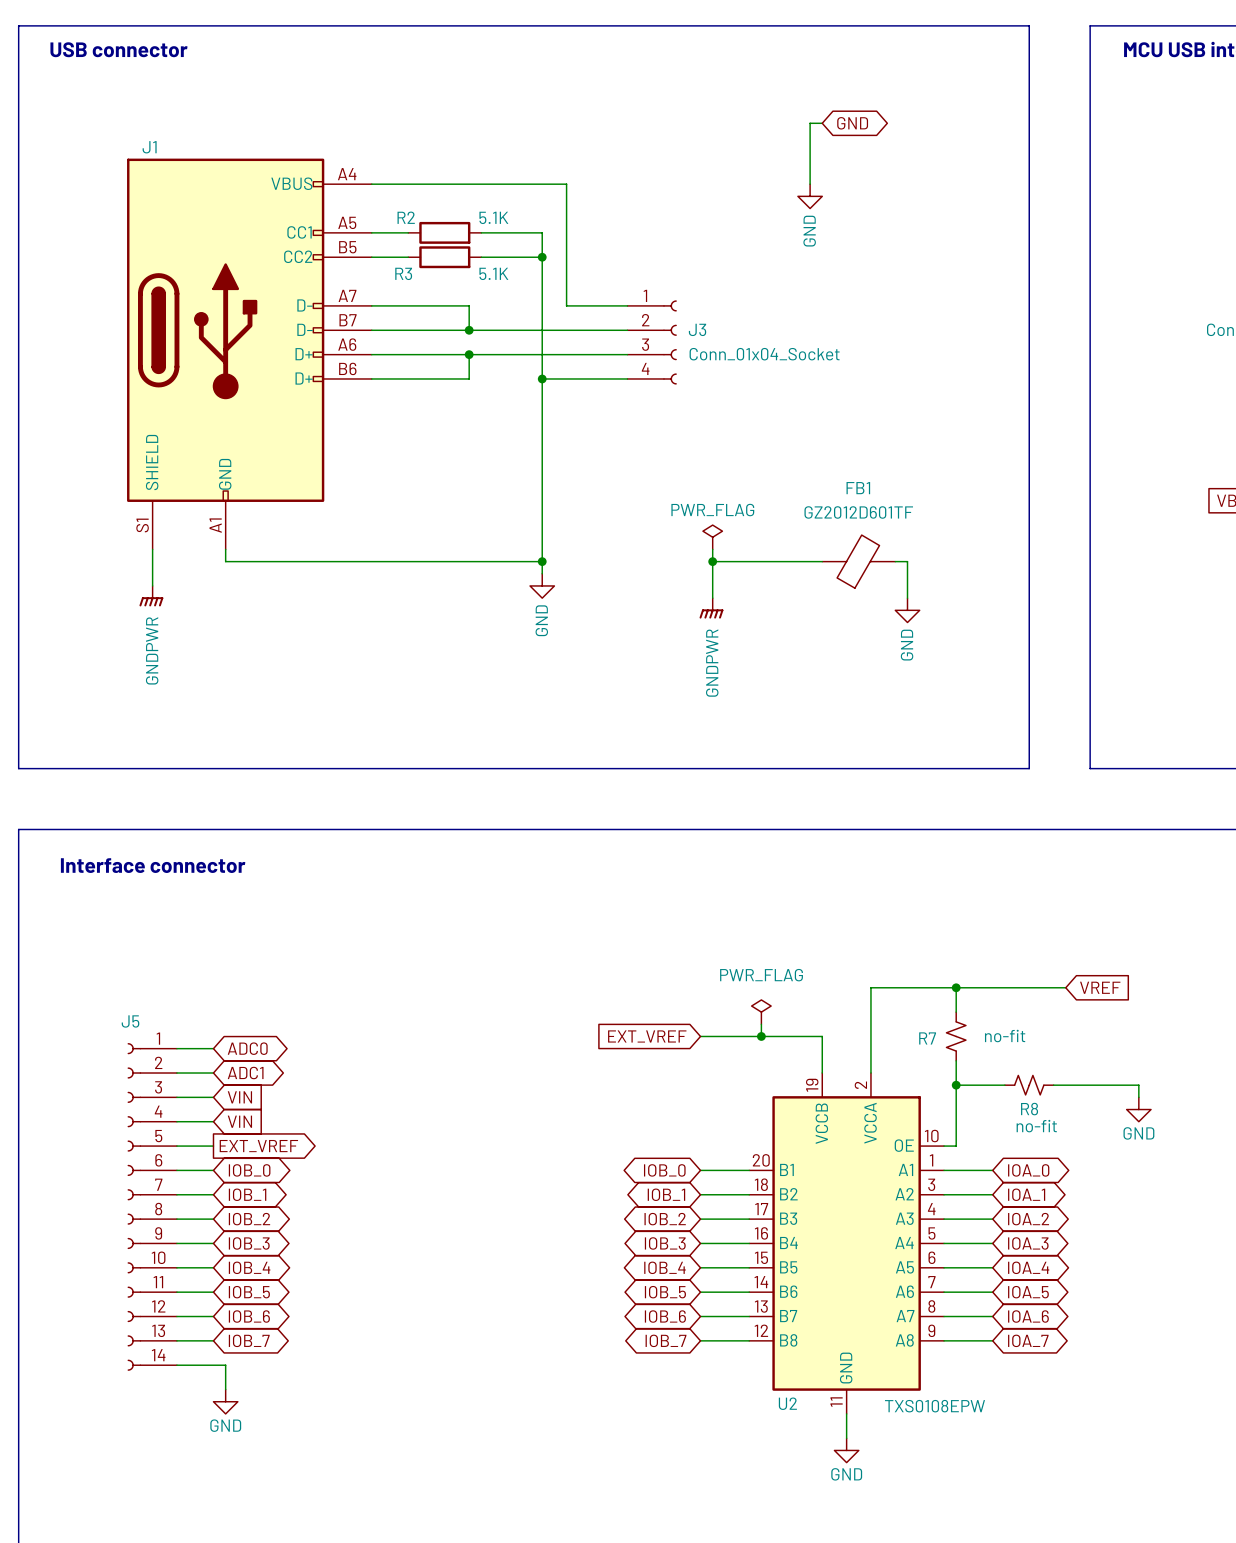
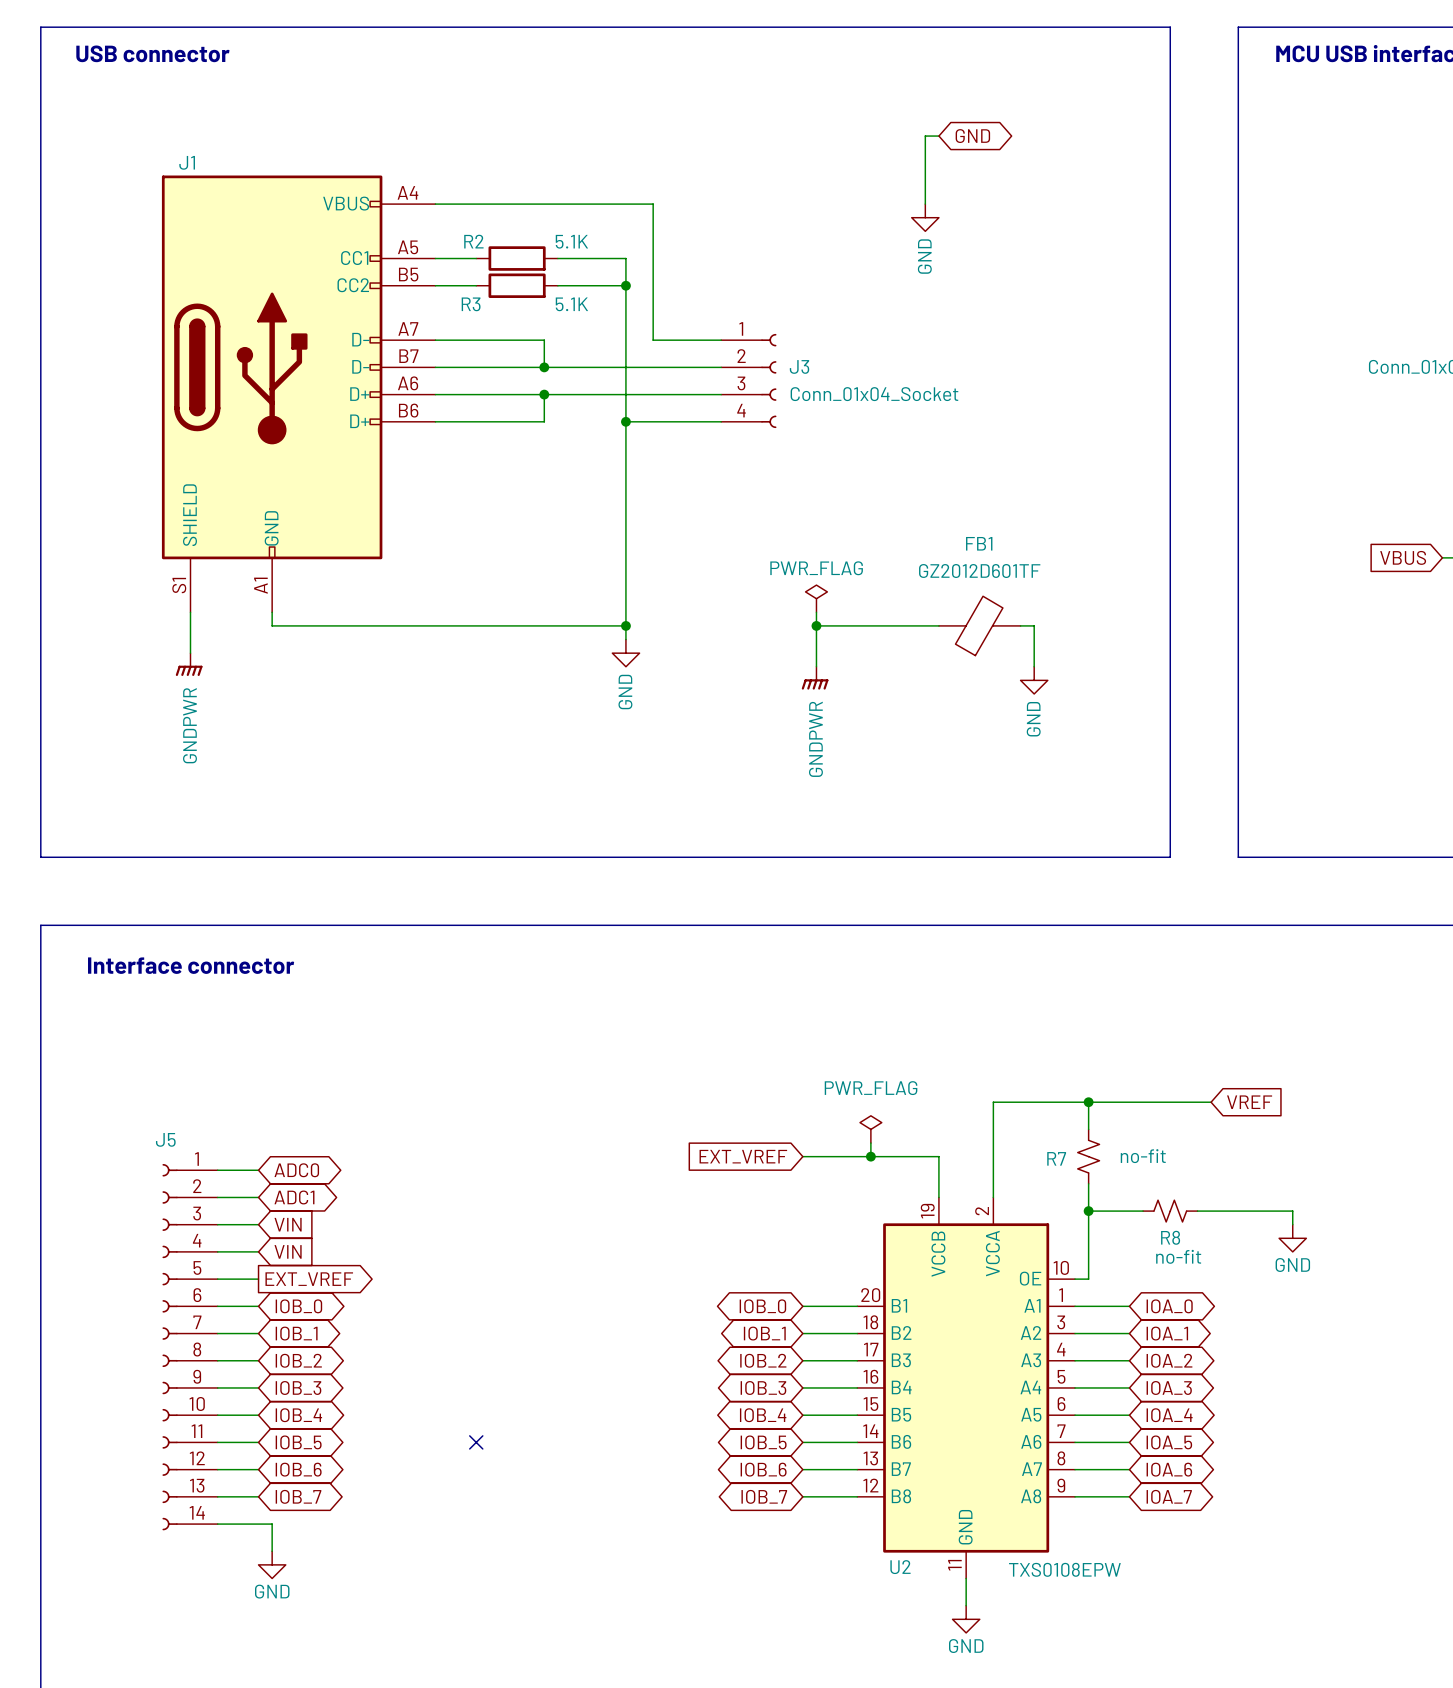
no-connect mark: none -> (476, 1442)

